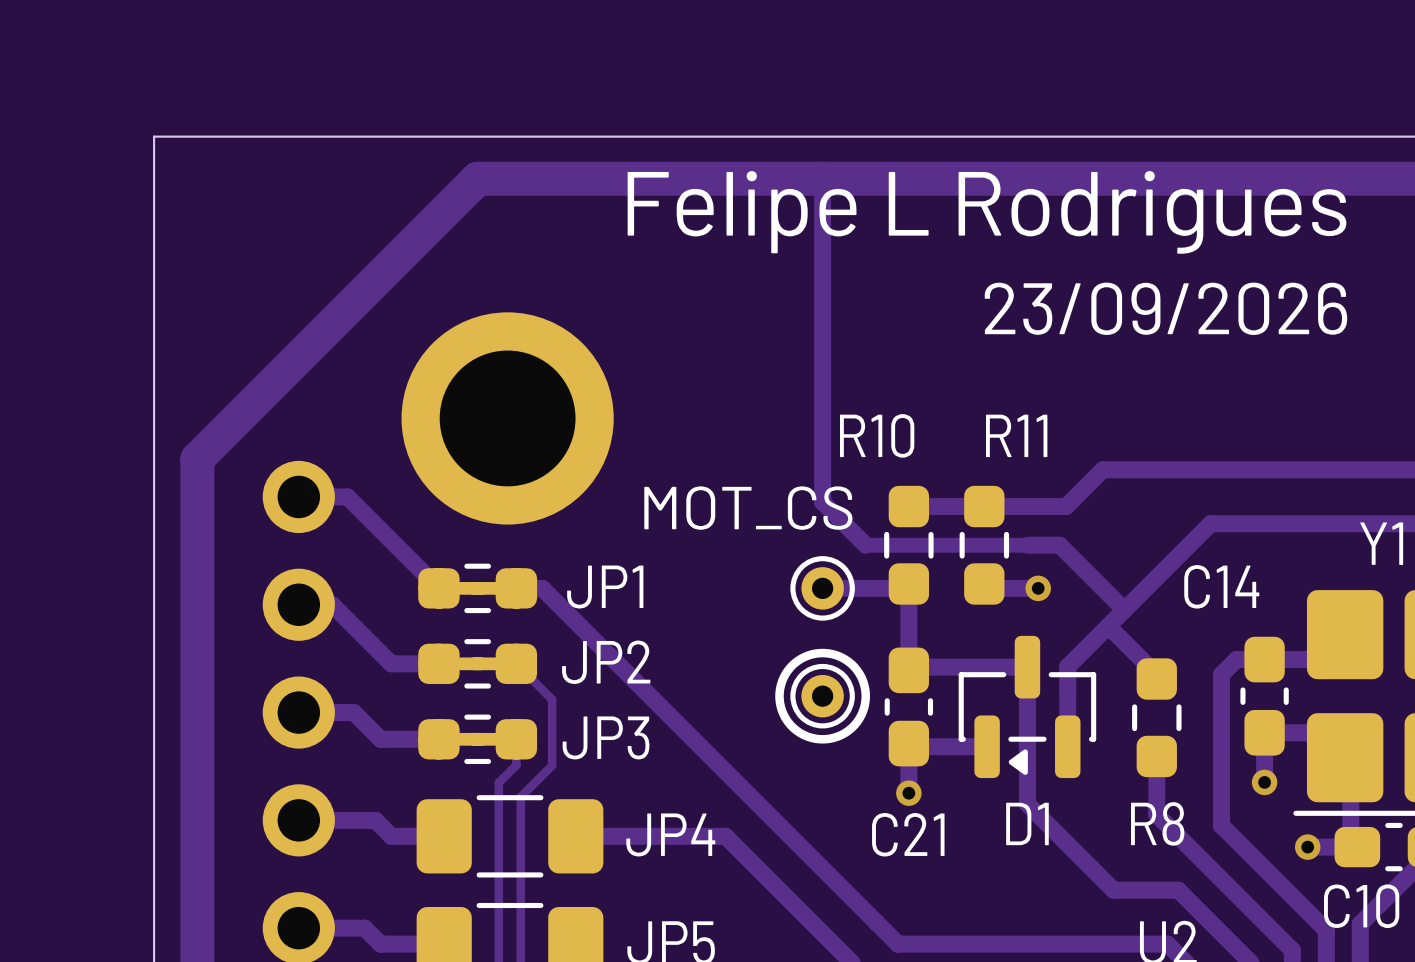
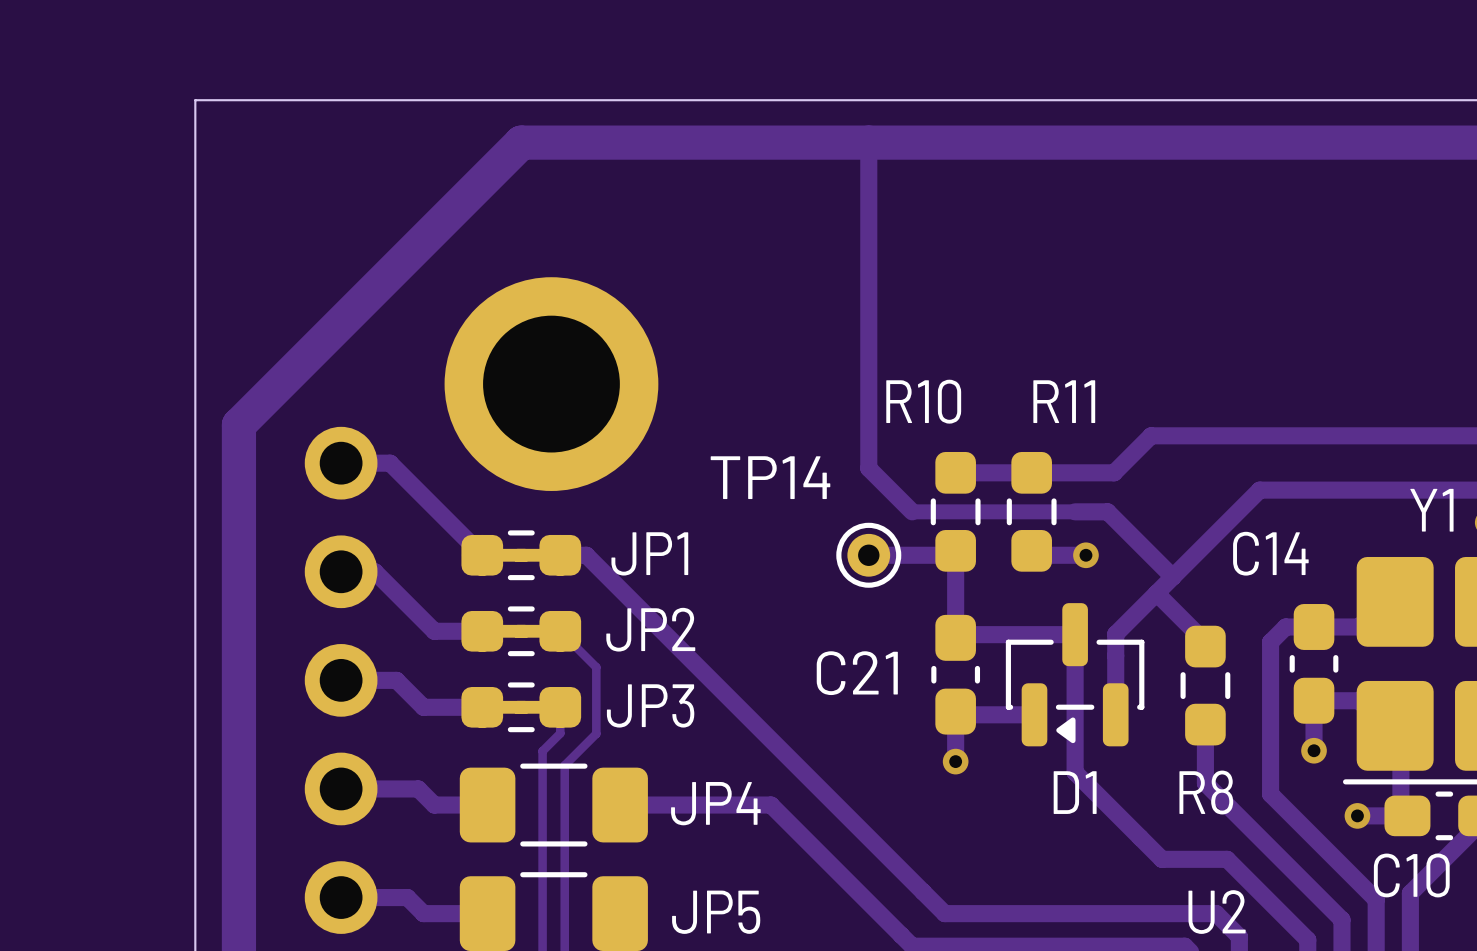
text: Felipe L Rodrigues (987, 212) -> none
text: 23/09/2026 (1165, 308) -> none
text: MOT_CS (748, 508) -> none
TP14 name: none -> TP14 (770, 477)
drawing: [775, 648, 870, 744] -> none
part: (822, 696) -> none
C21 name position: C21 (908, 834) -> C21 (857, 673)

